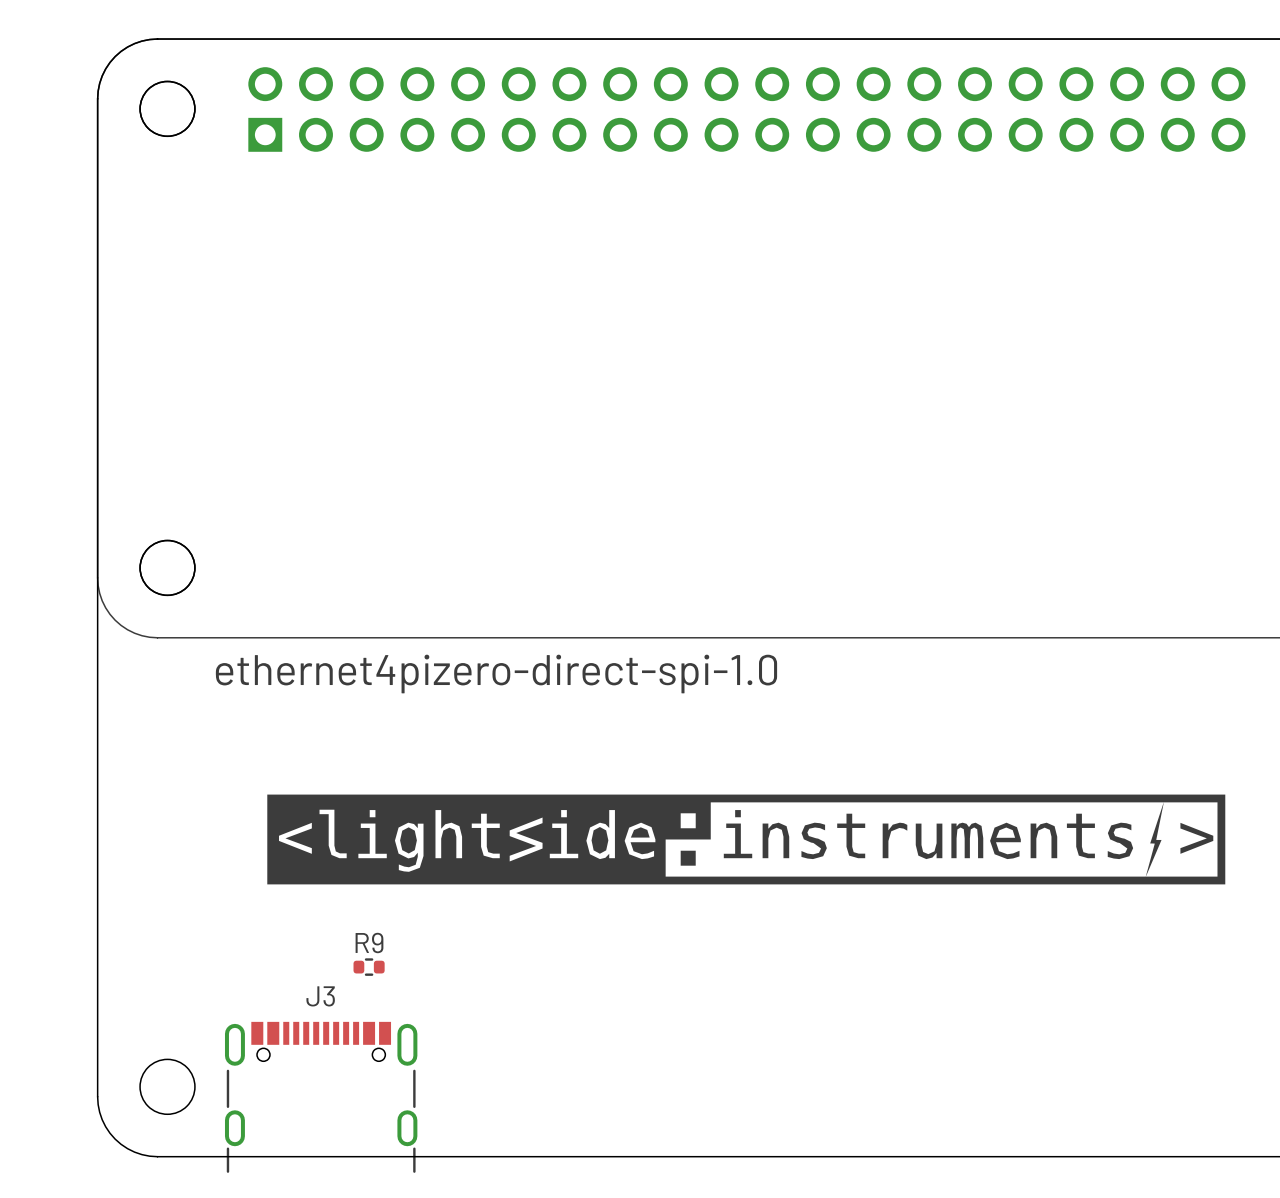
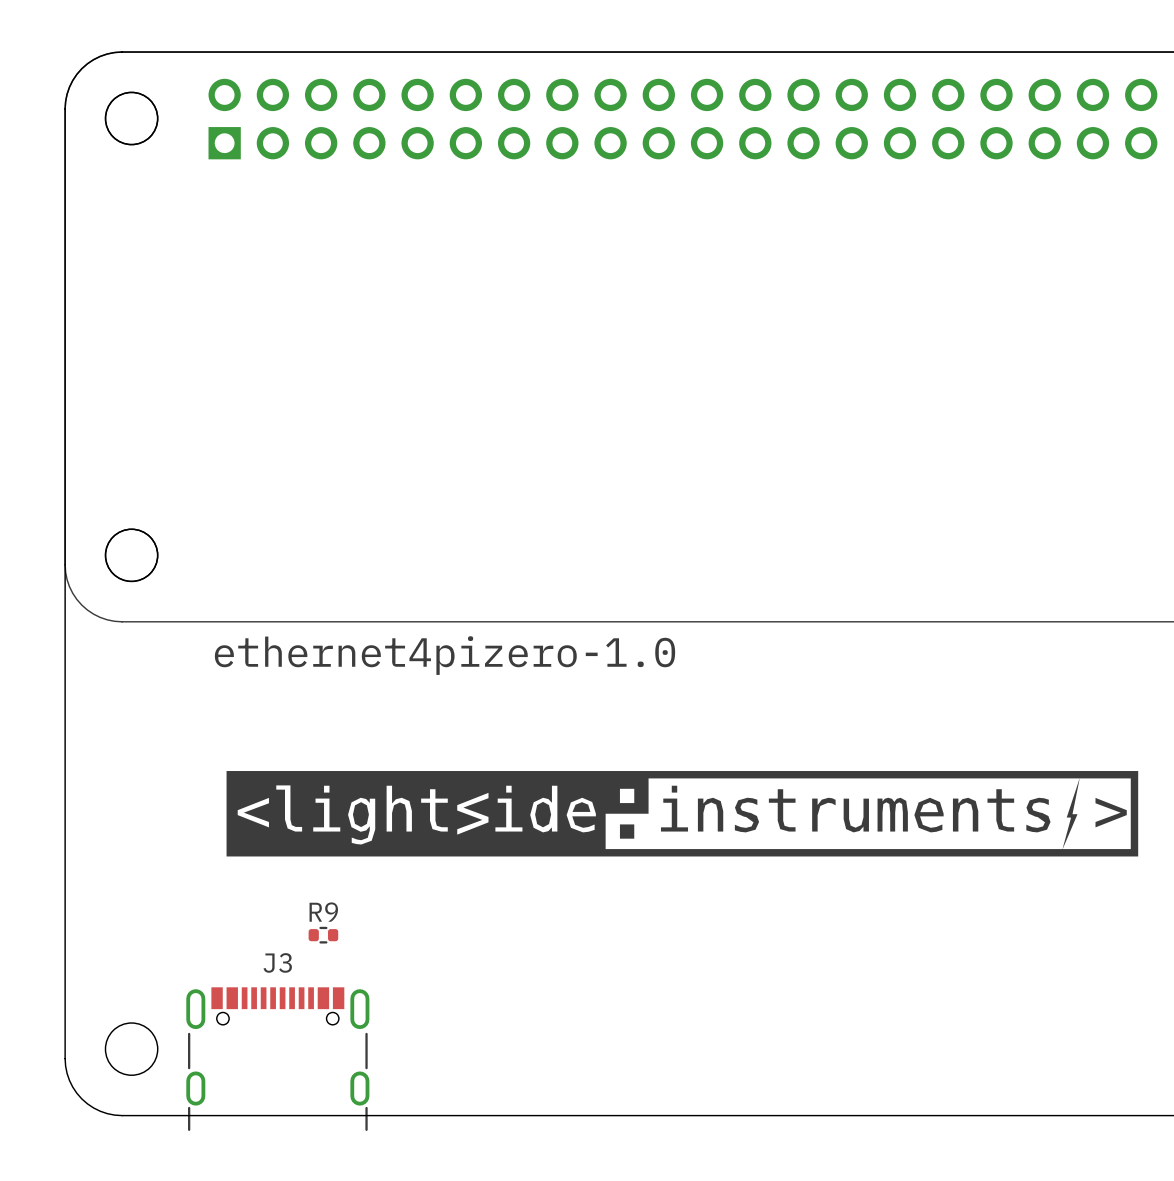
text: ethernet4pizero-direct-spi-1.0 (496, 674) -> ethernet4pizero-1.0 (445, 655)

